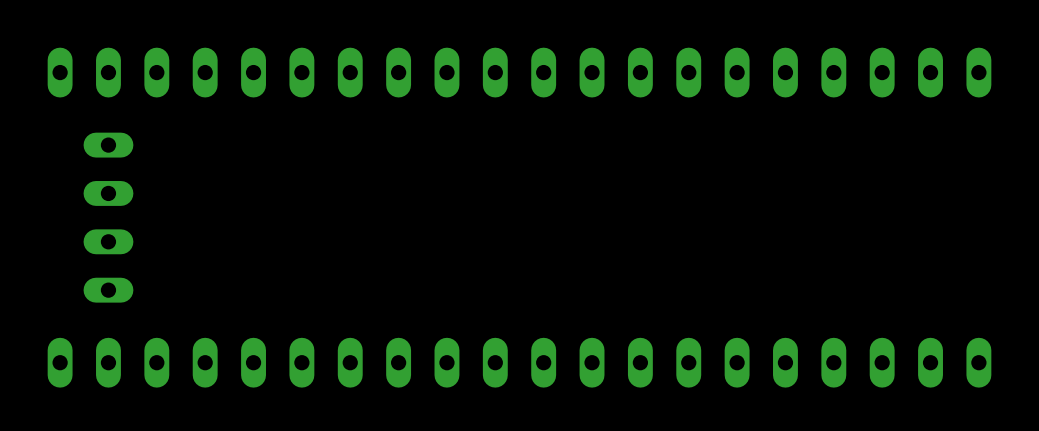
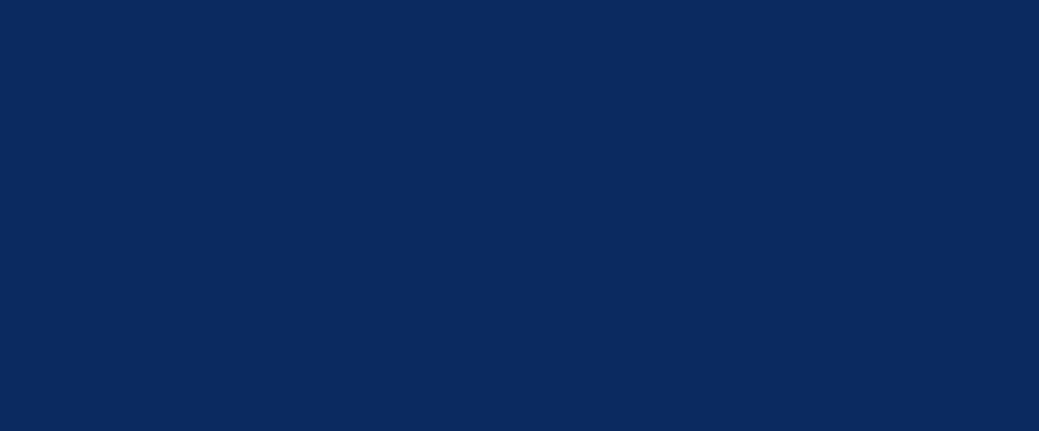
part: (519, 217) -> none

